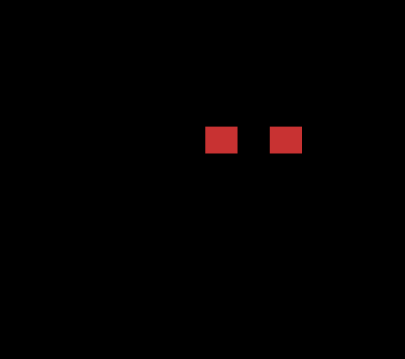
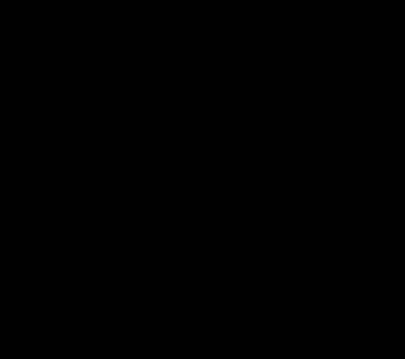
part: (253, 140) -> none

